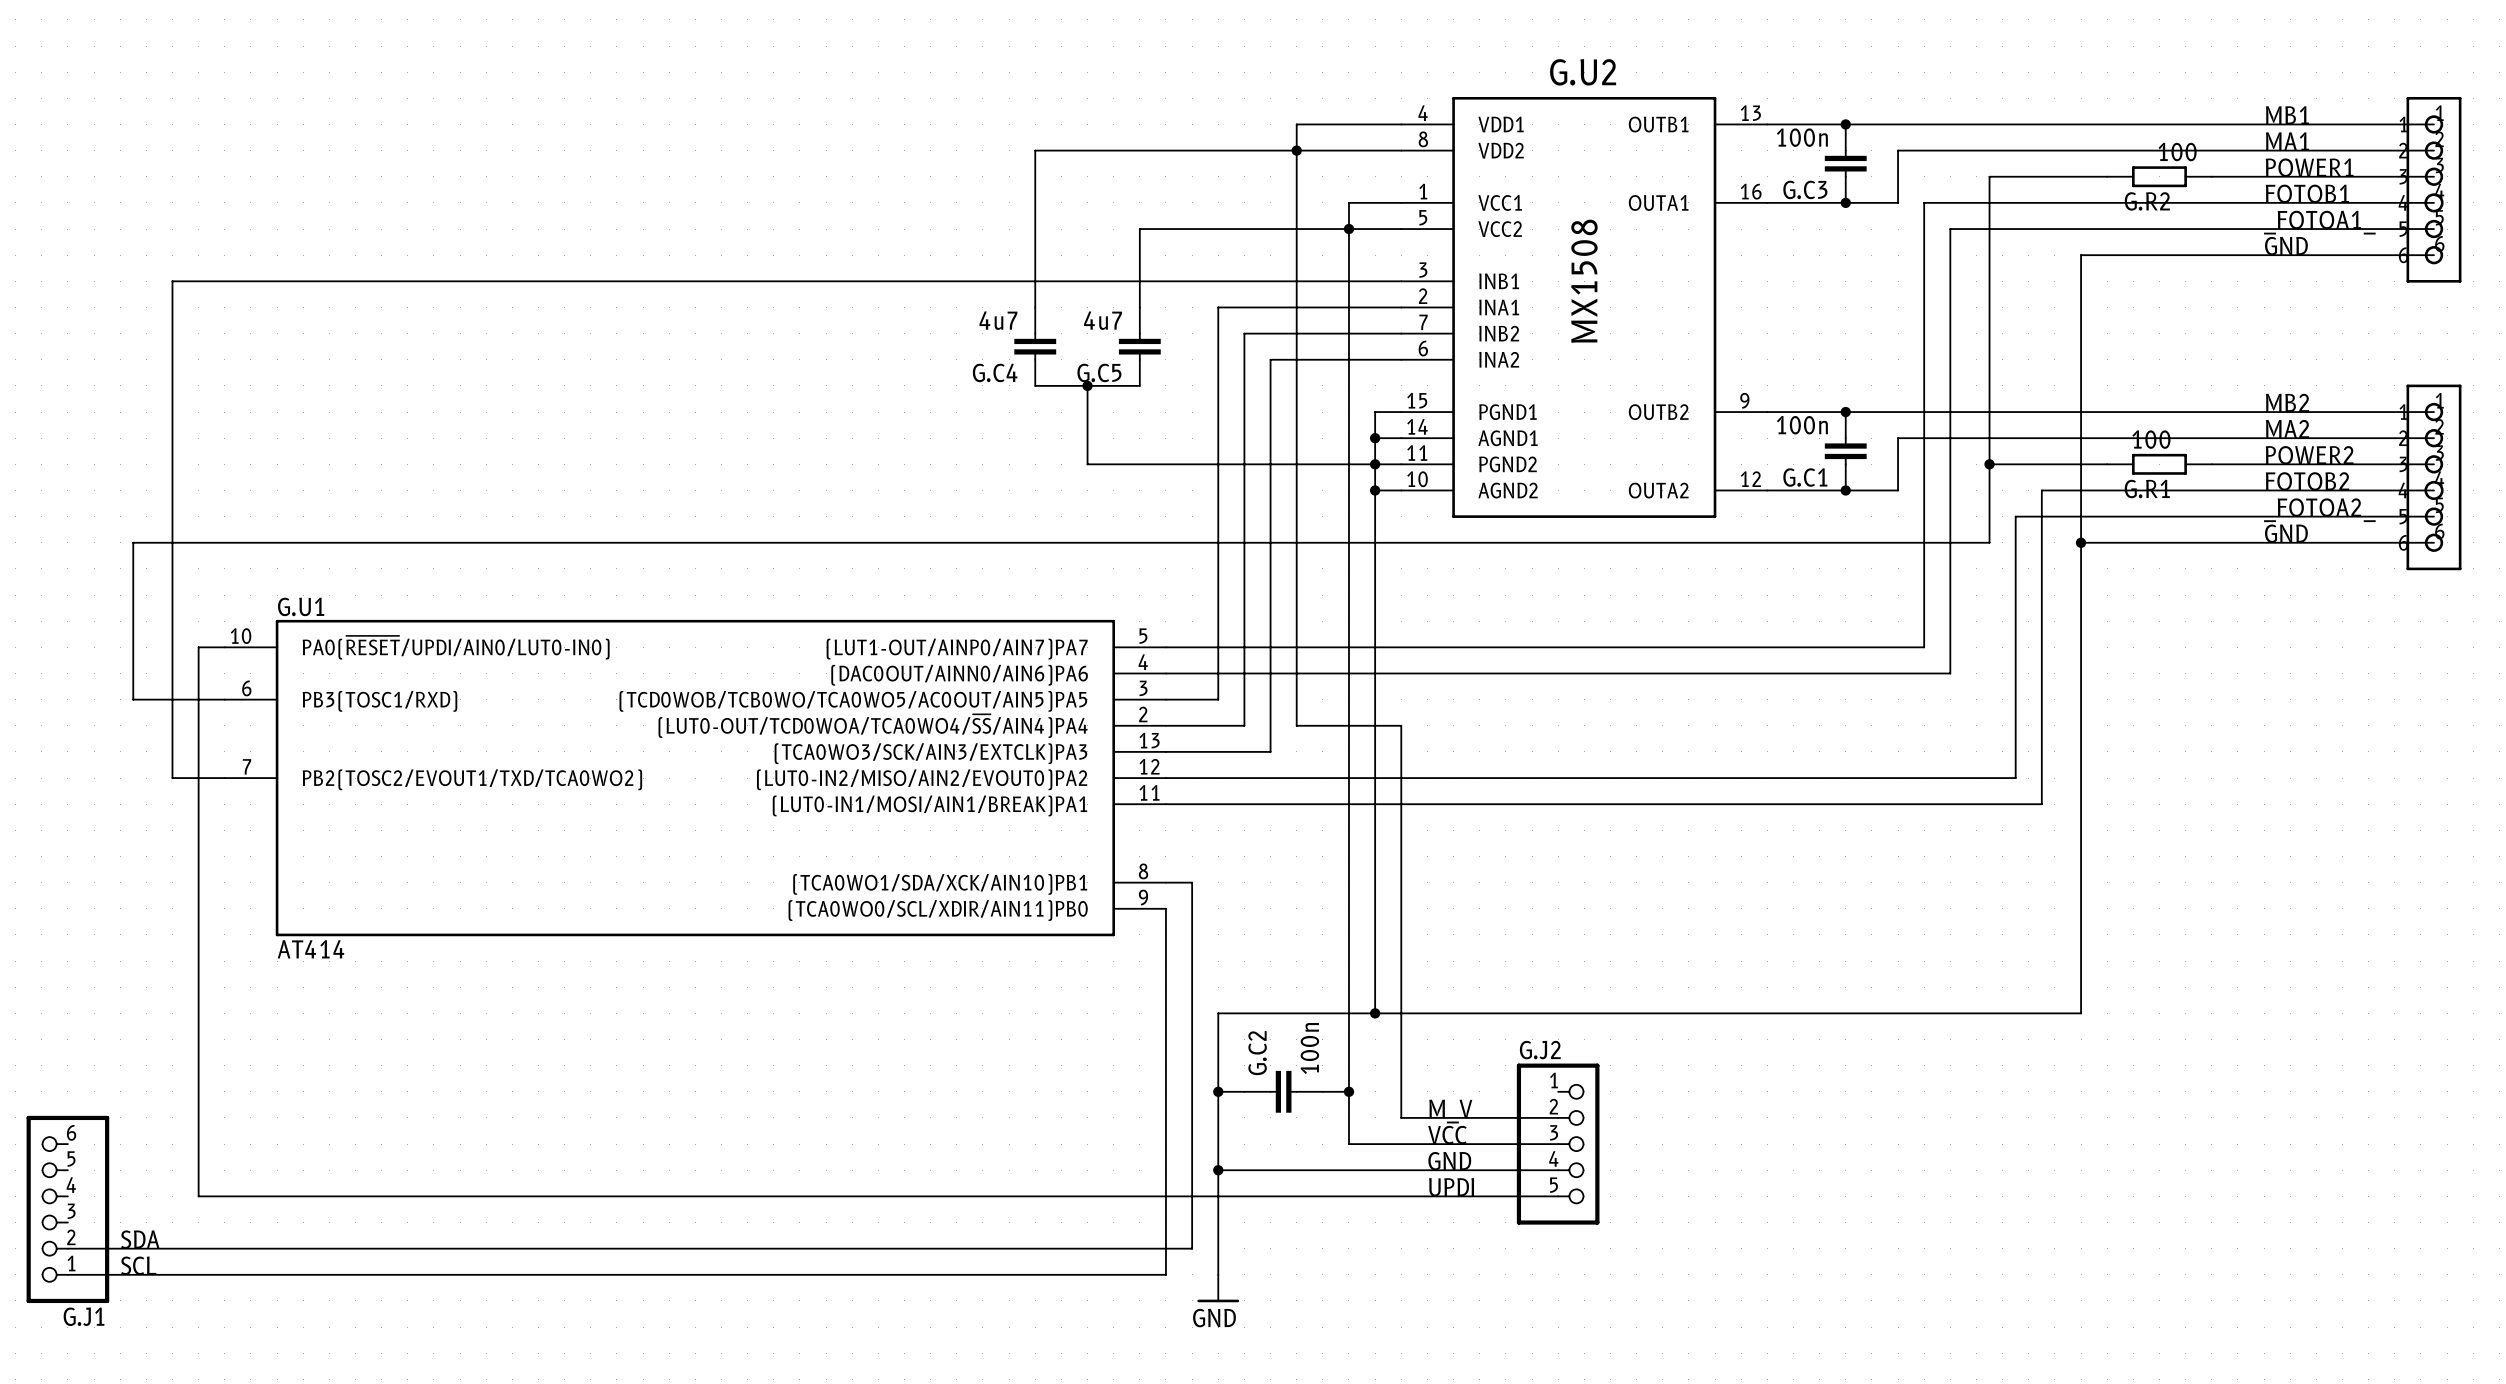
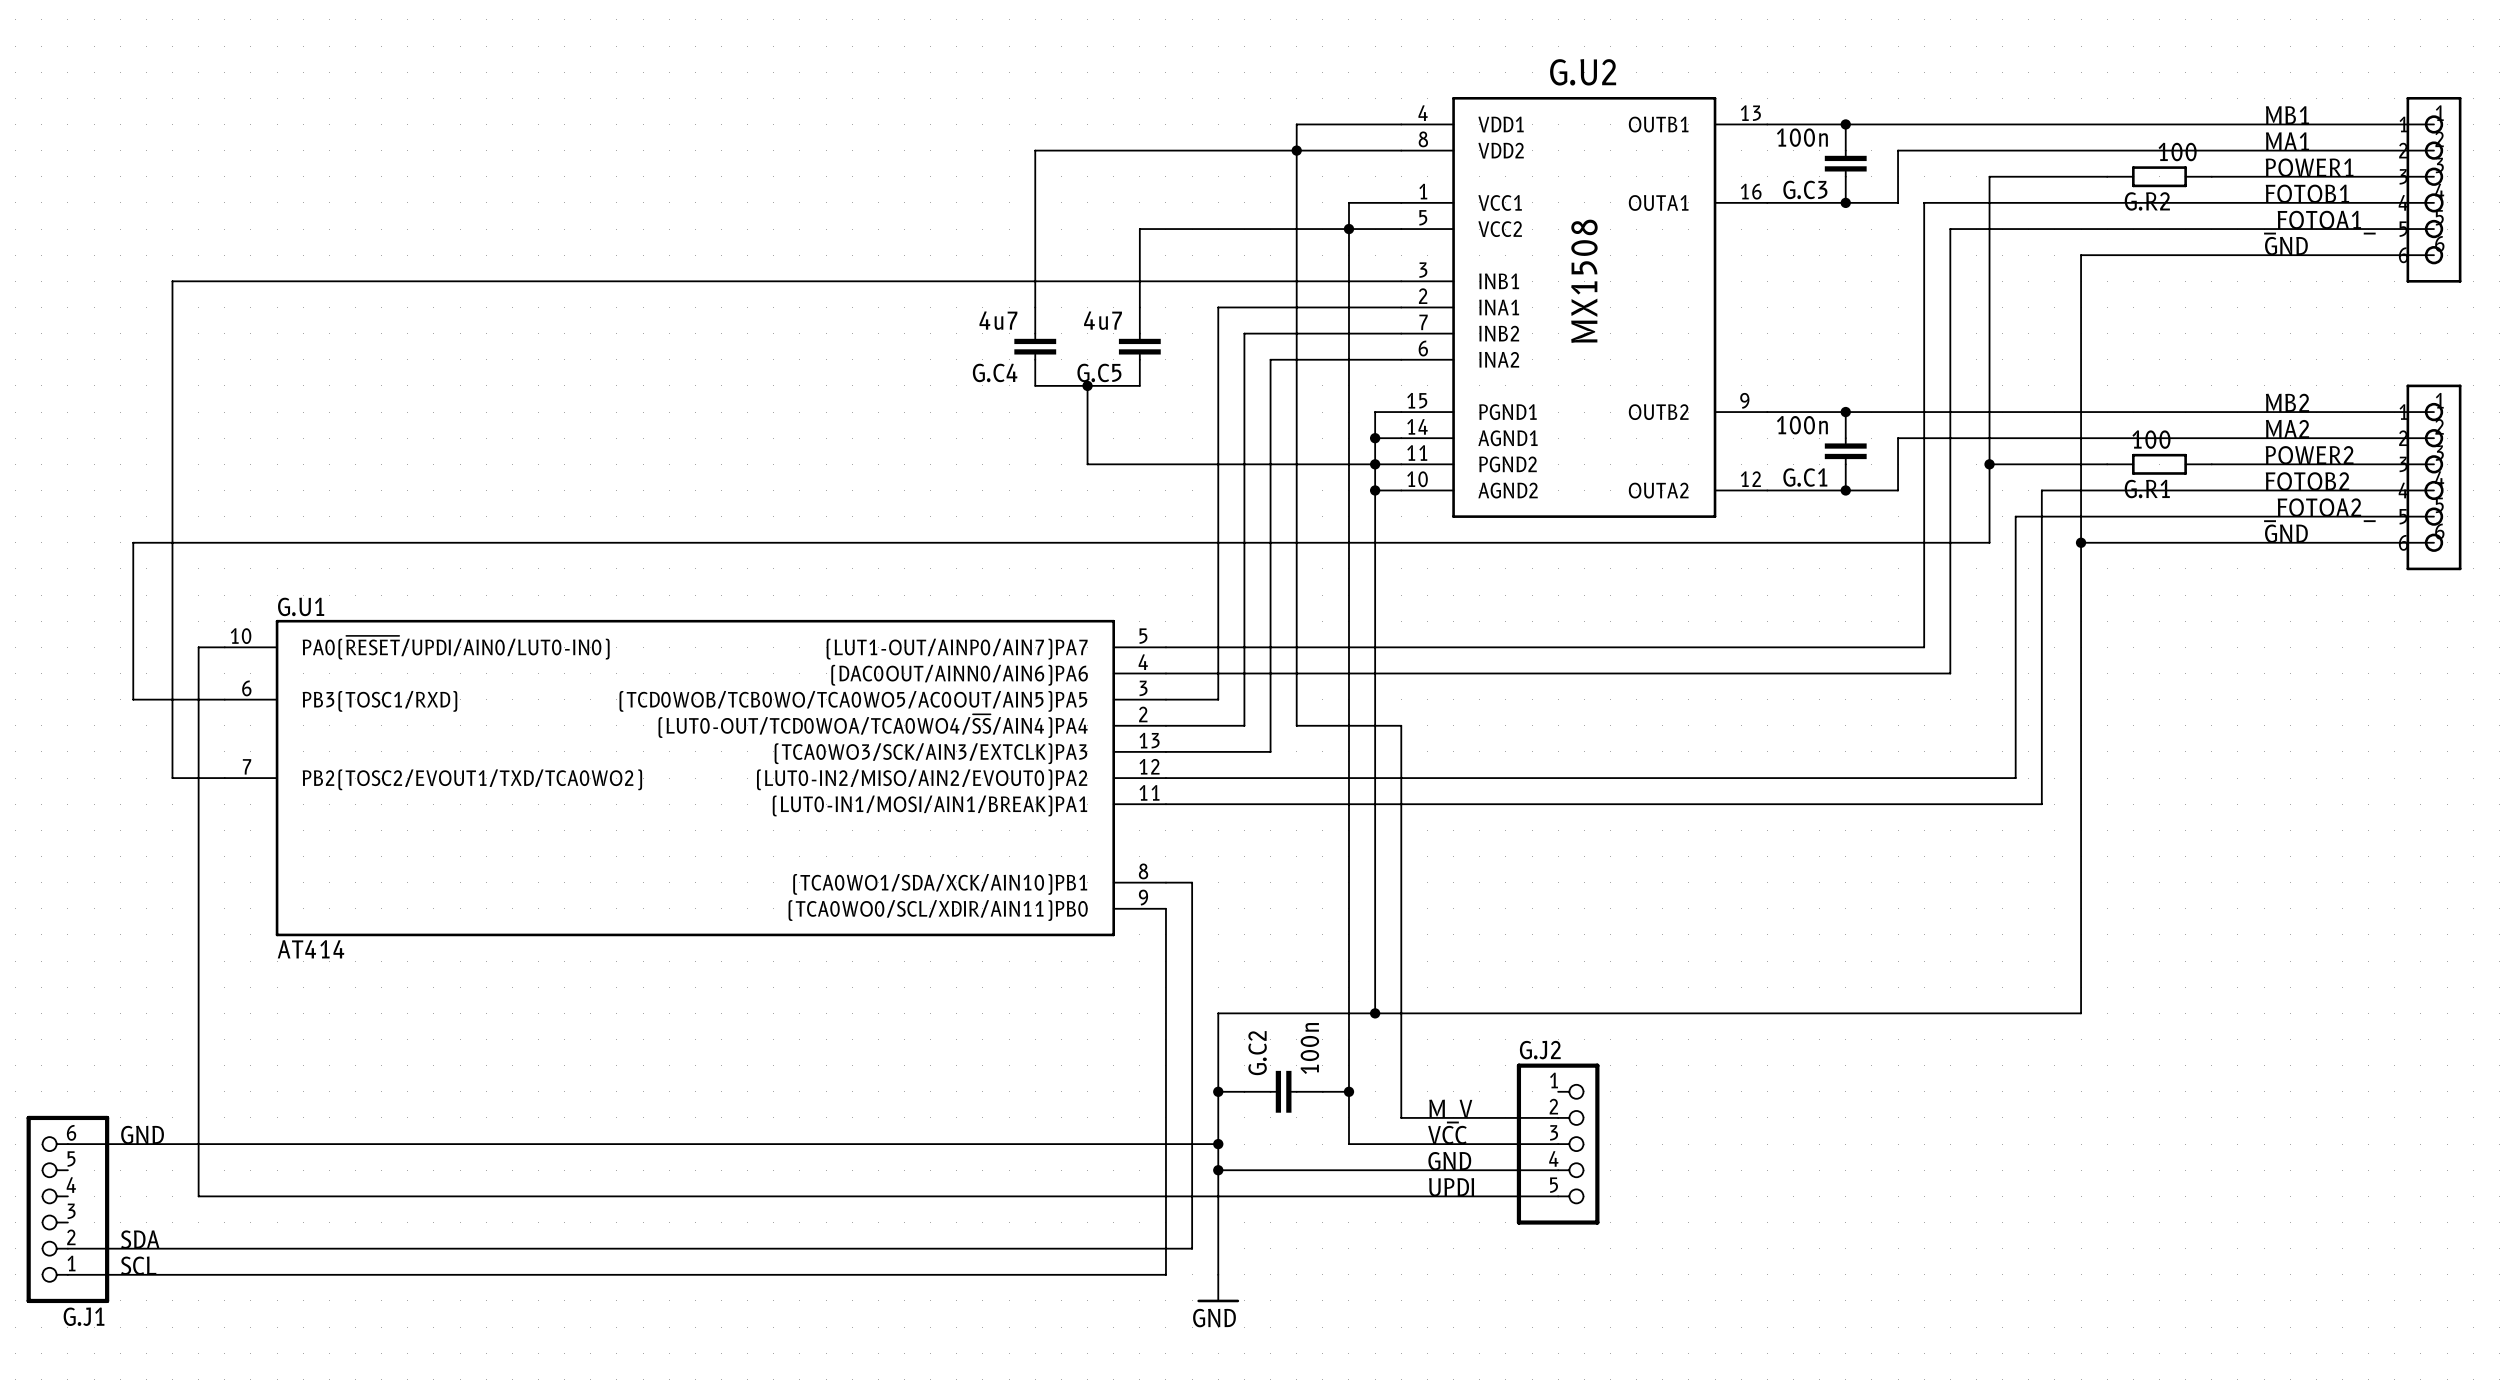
label: none -> GND (142, 1135)
wire: none -> (67, 1144) (1218, 1144)
junction: none -> (1218, 1144)

